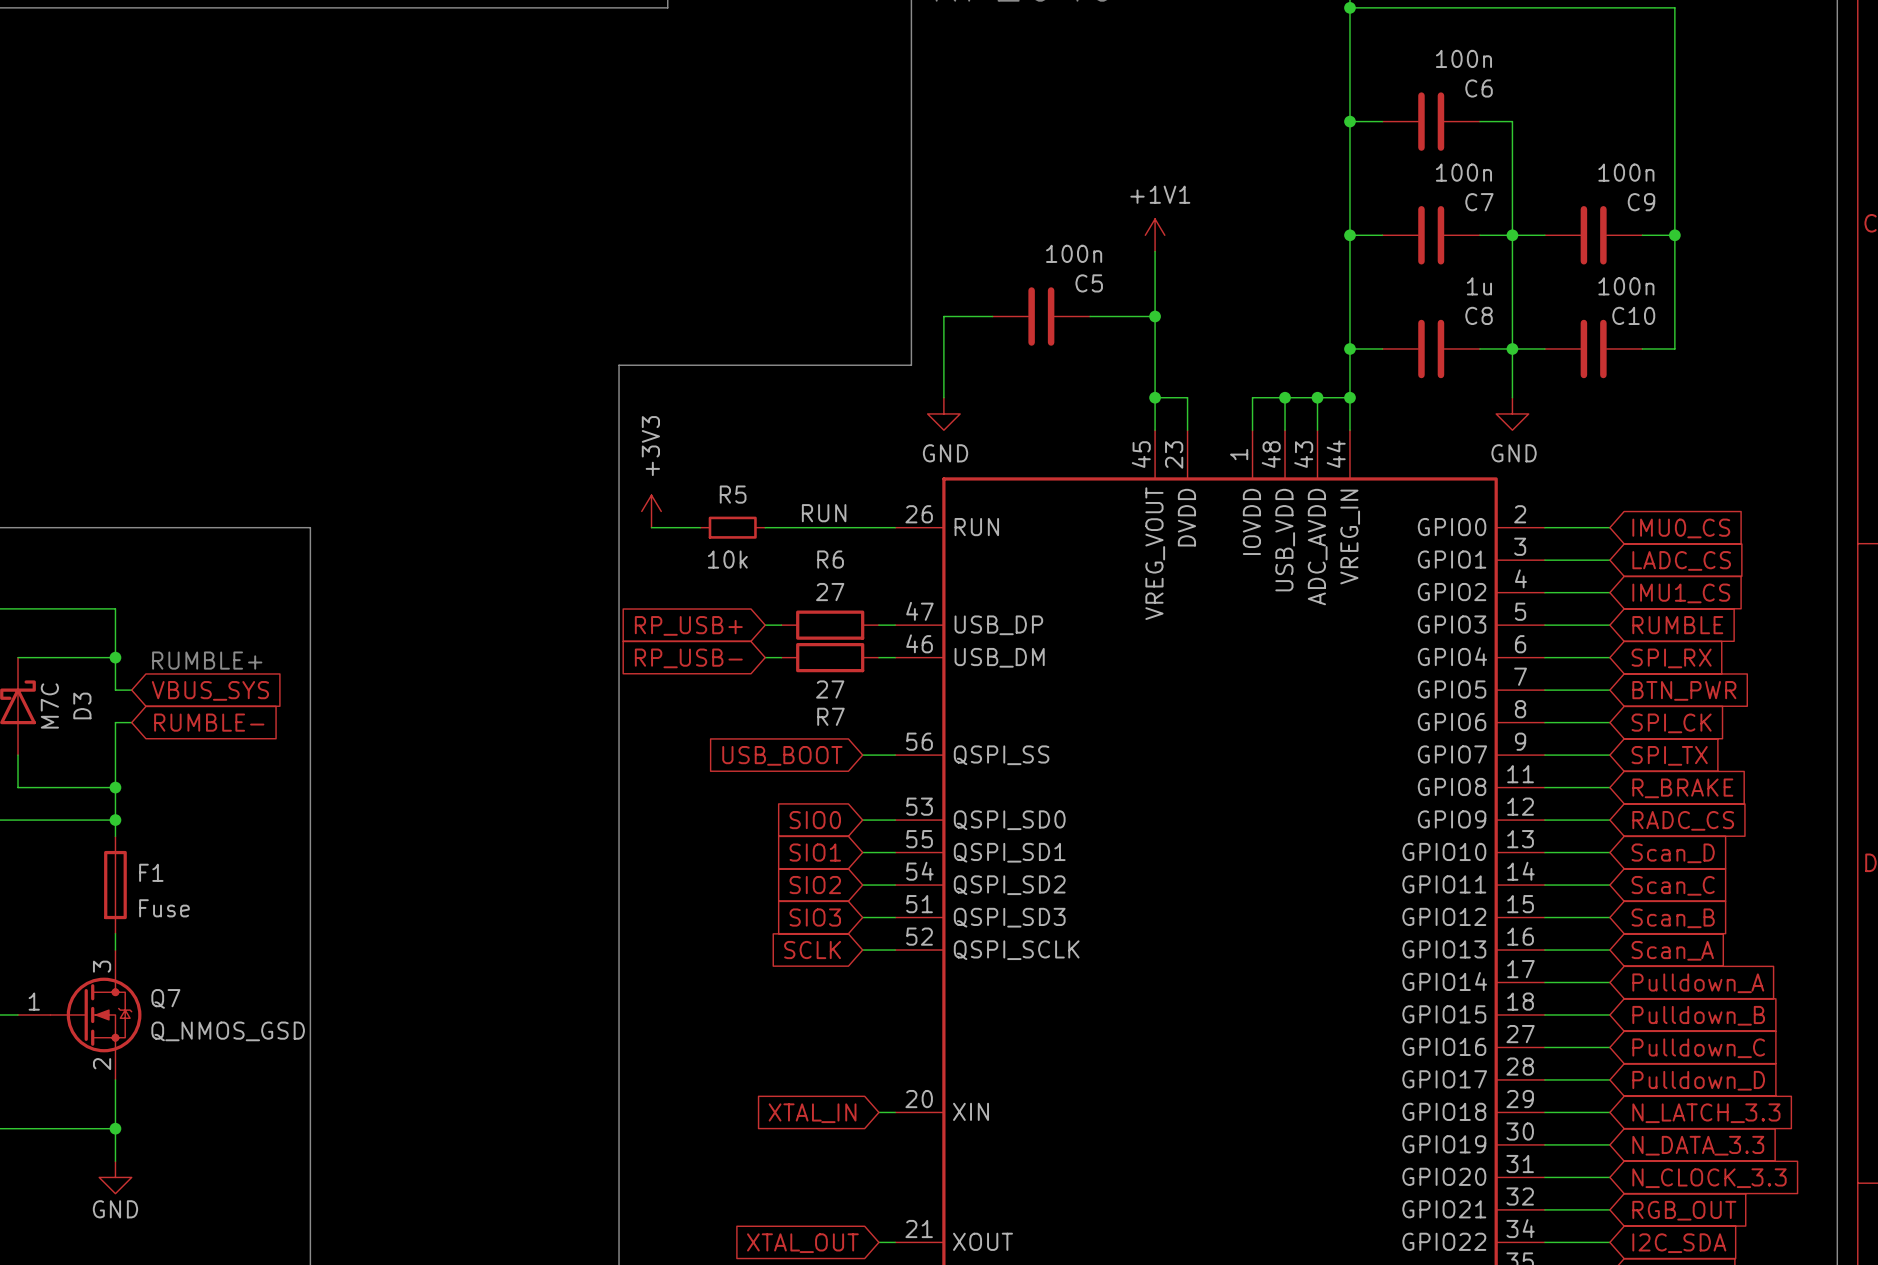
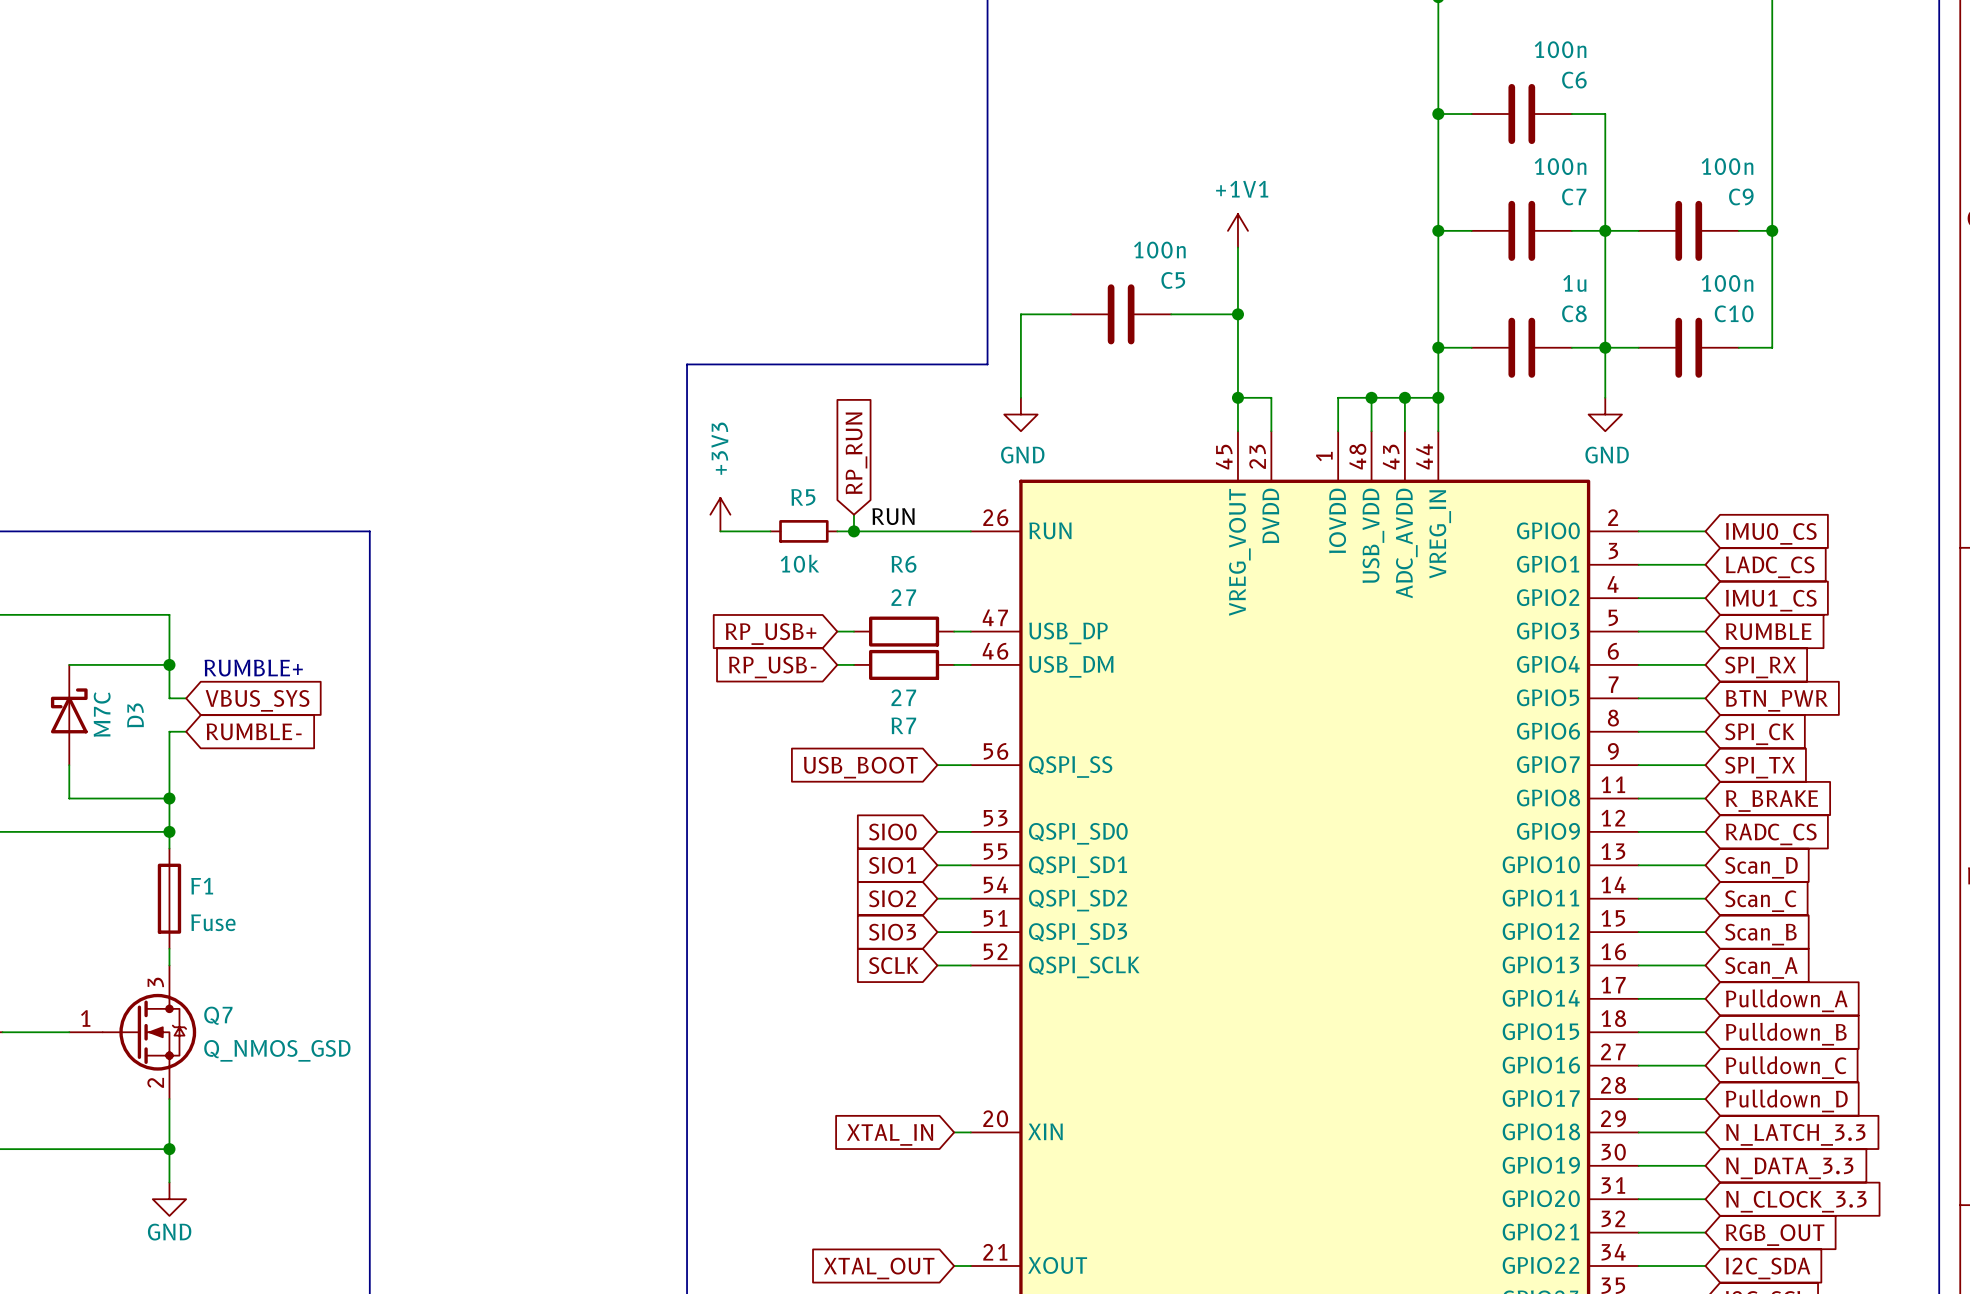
global label: none -> RP_RUN (856, 453)
wire: none -> (853, 514) (853, 531)
junction: none -> (853, 531)

